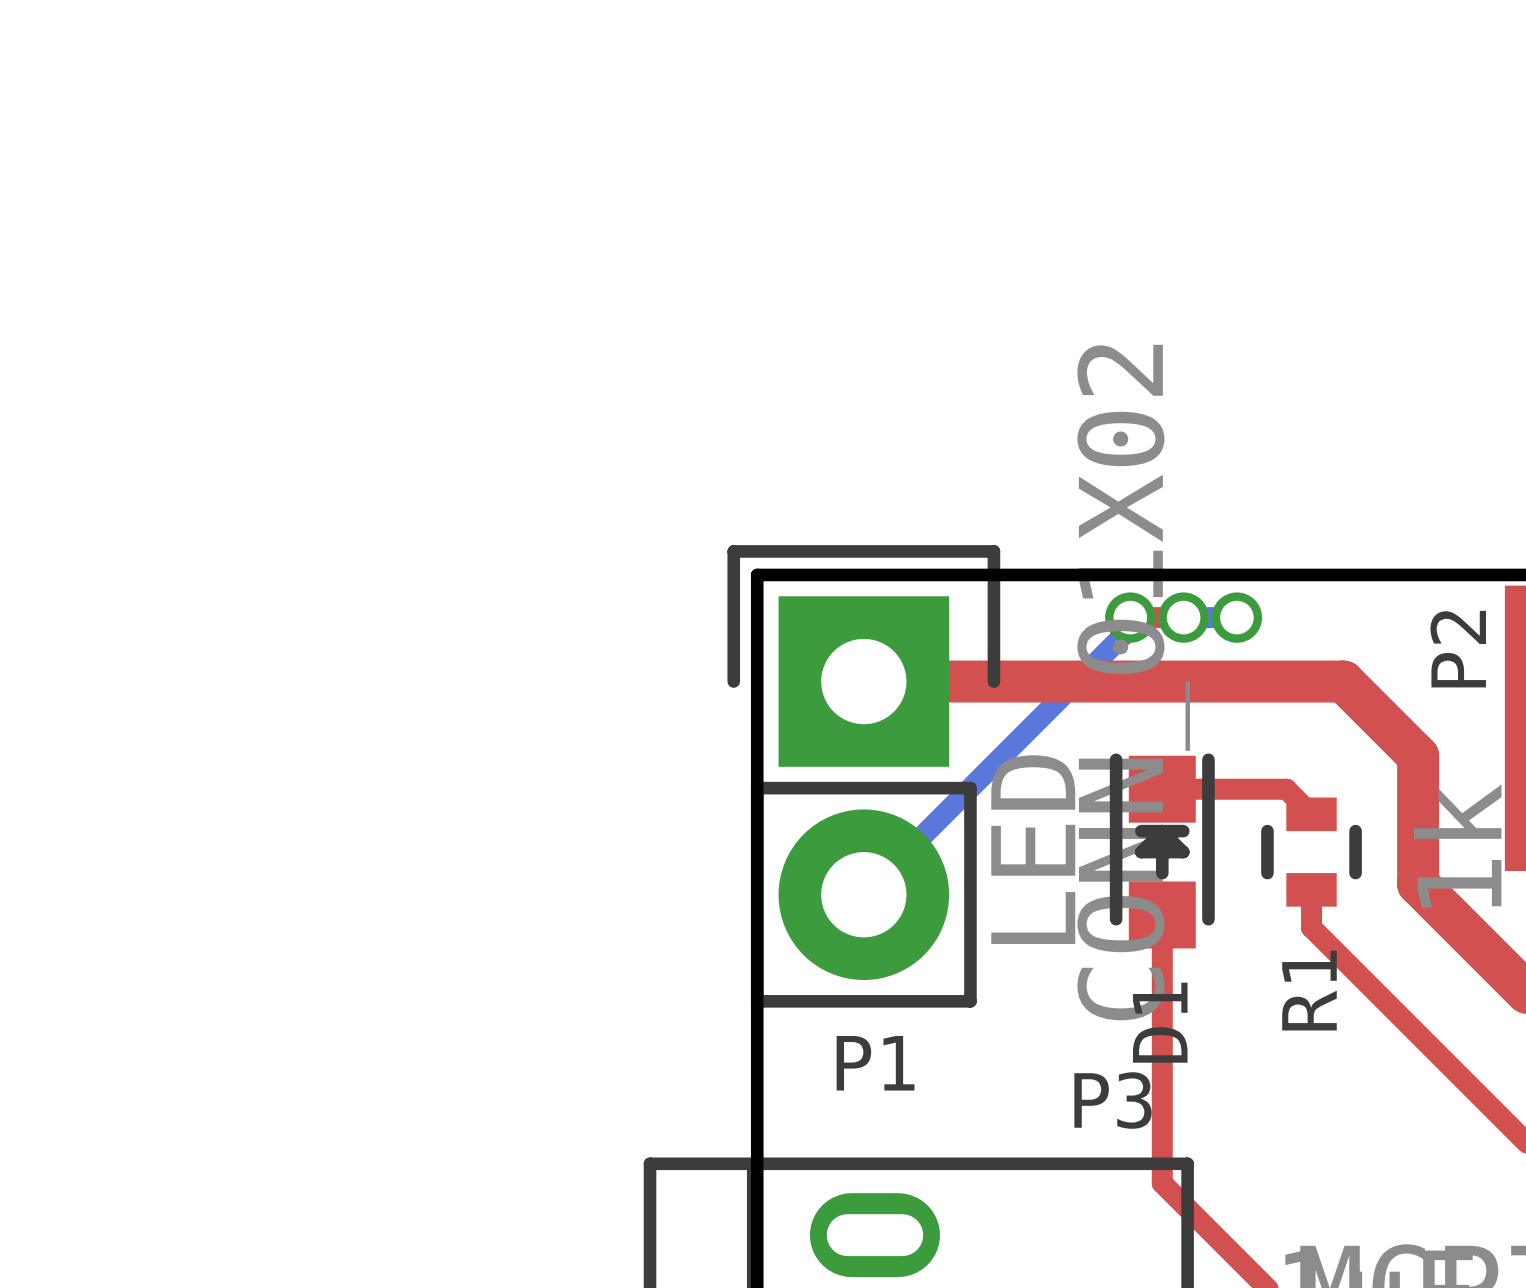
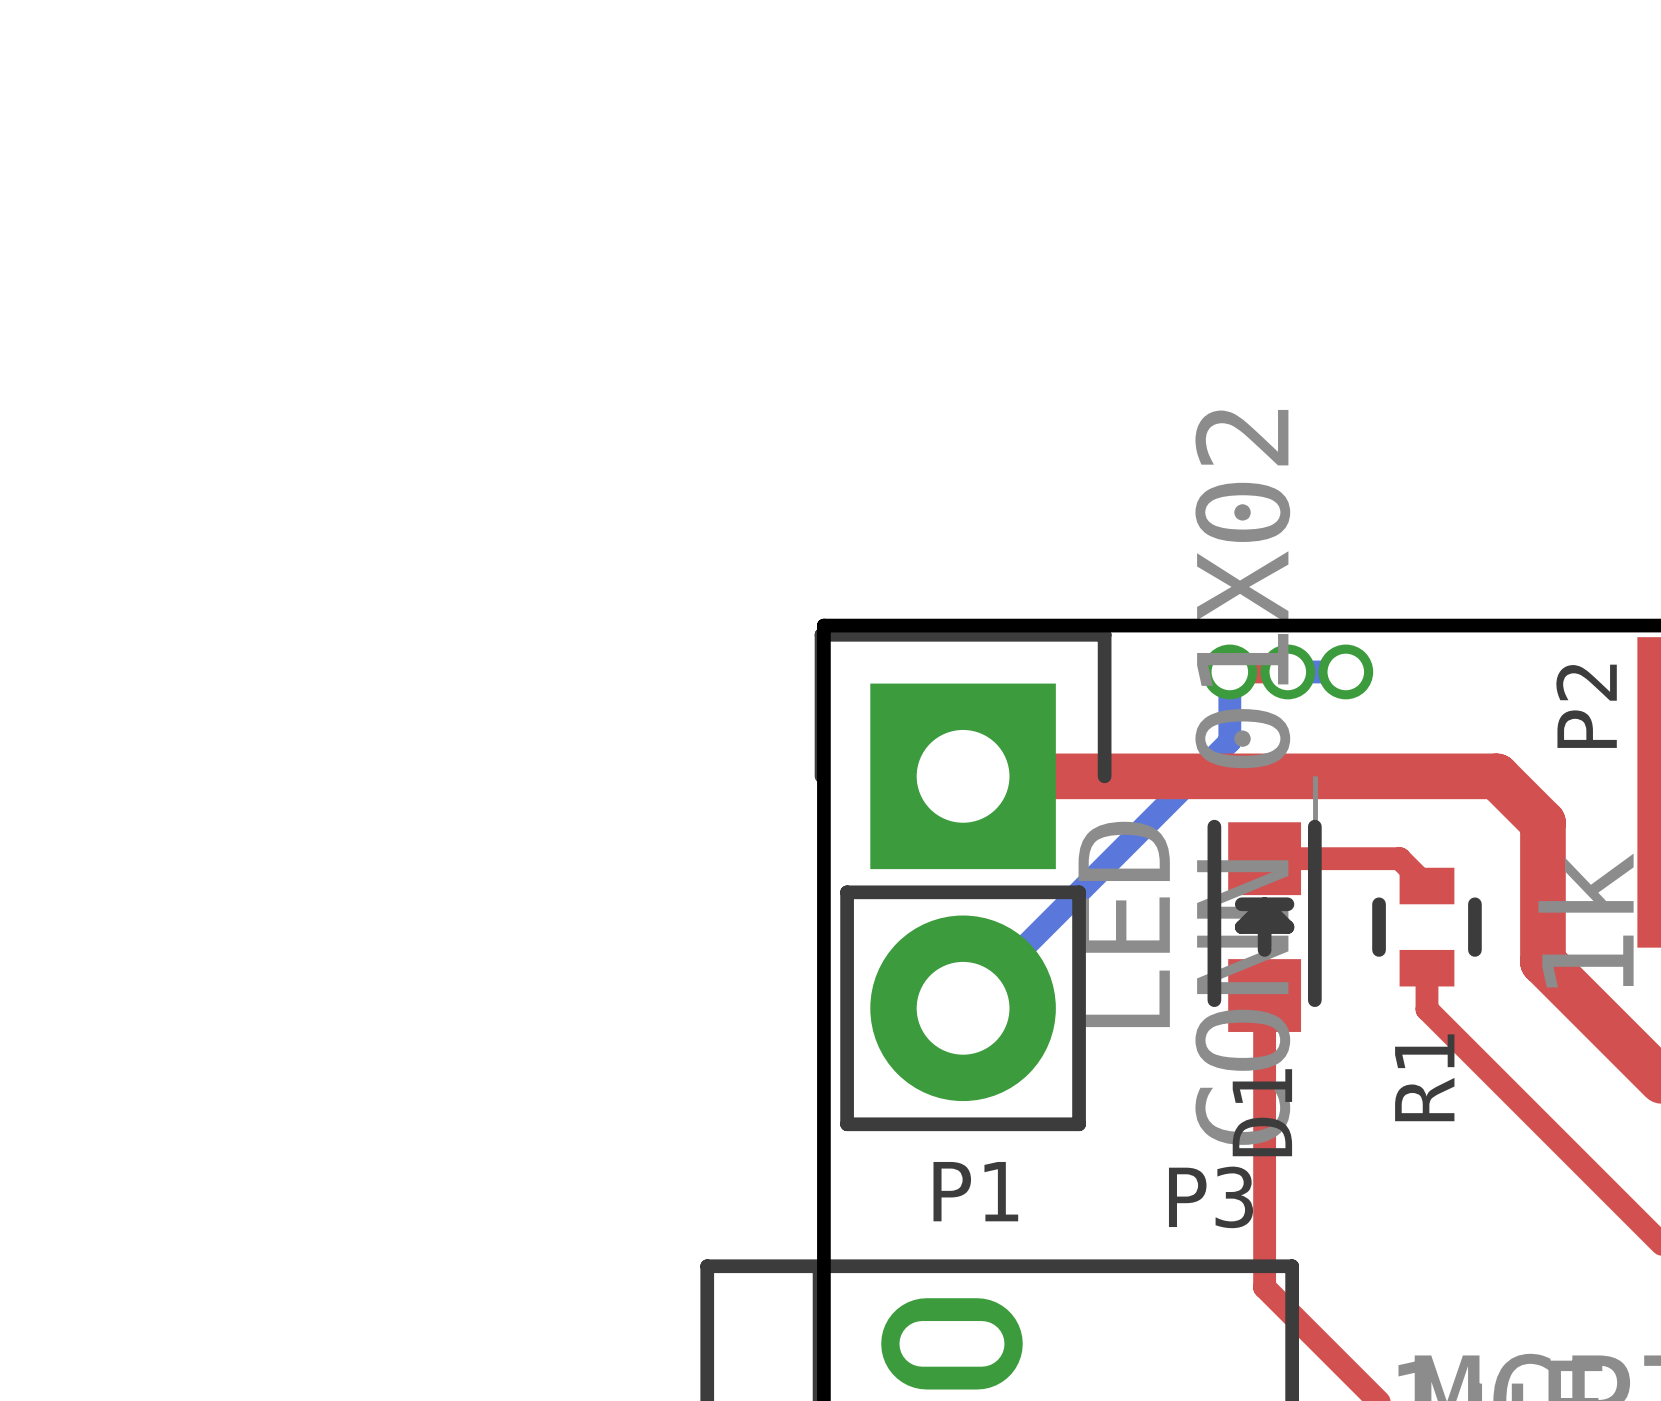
bottom track: (1130, 628) (863, 894) -> (1229, 683) (1229, 741) (963, 1008)
top track: (863, 681) (1343, 681) (1375, 713) -> (963, 776) (1496, 776)
P1 position: (863, 776) -> (963, 879)

